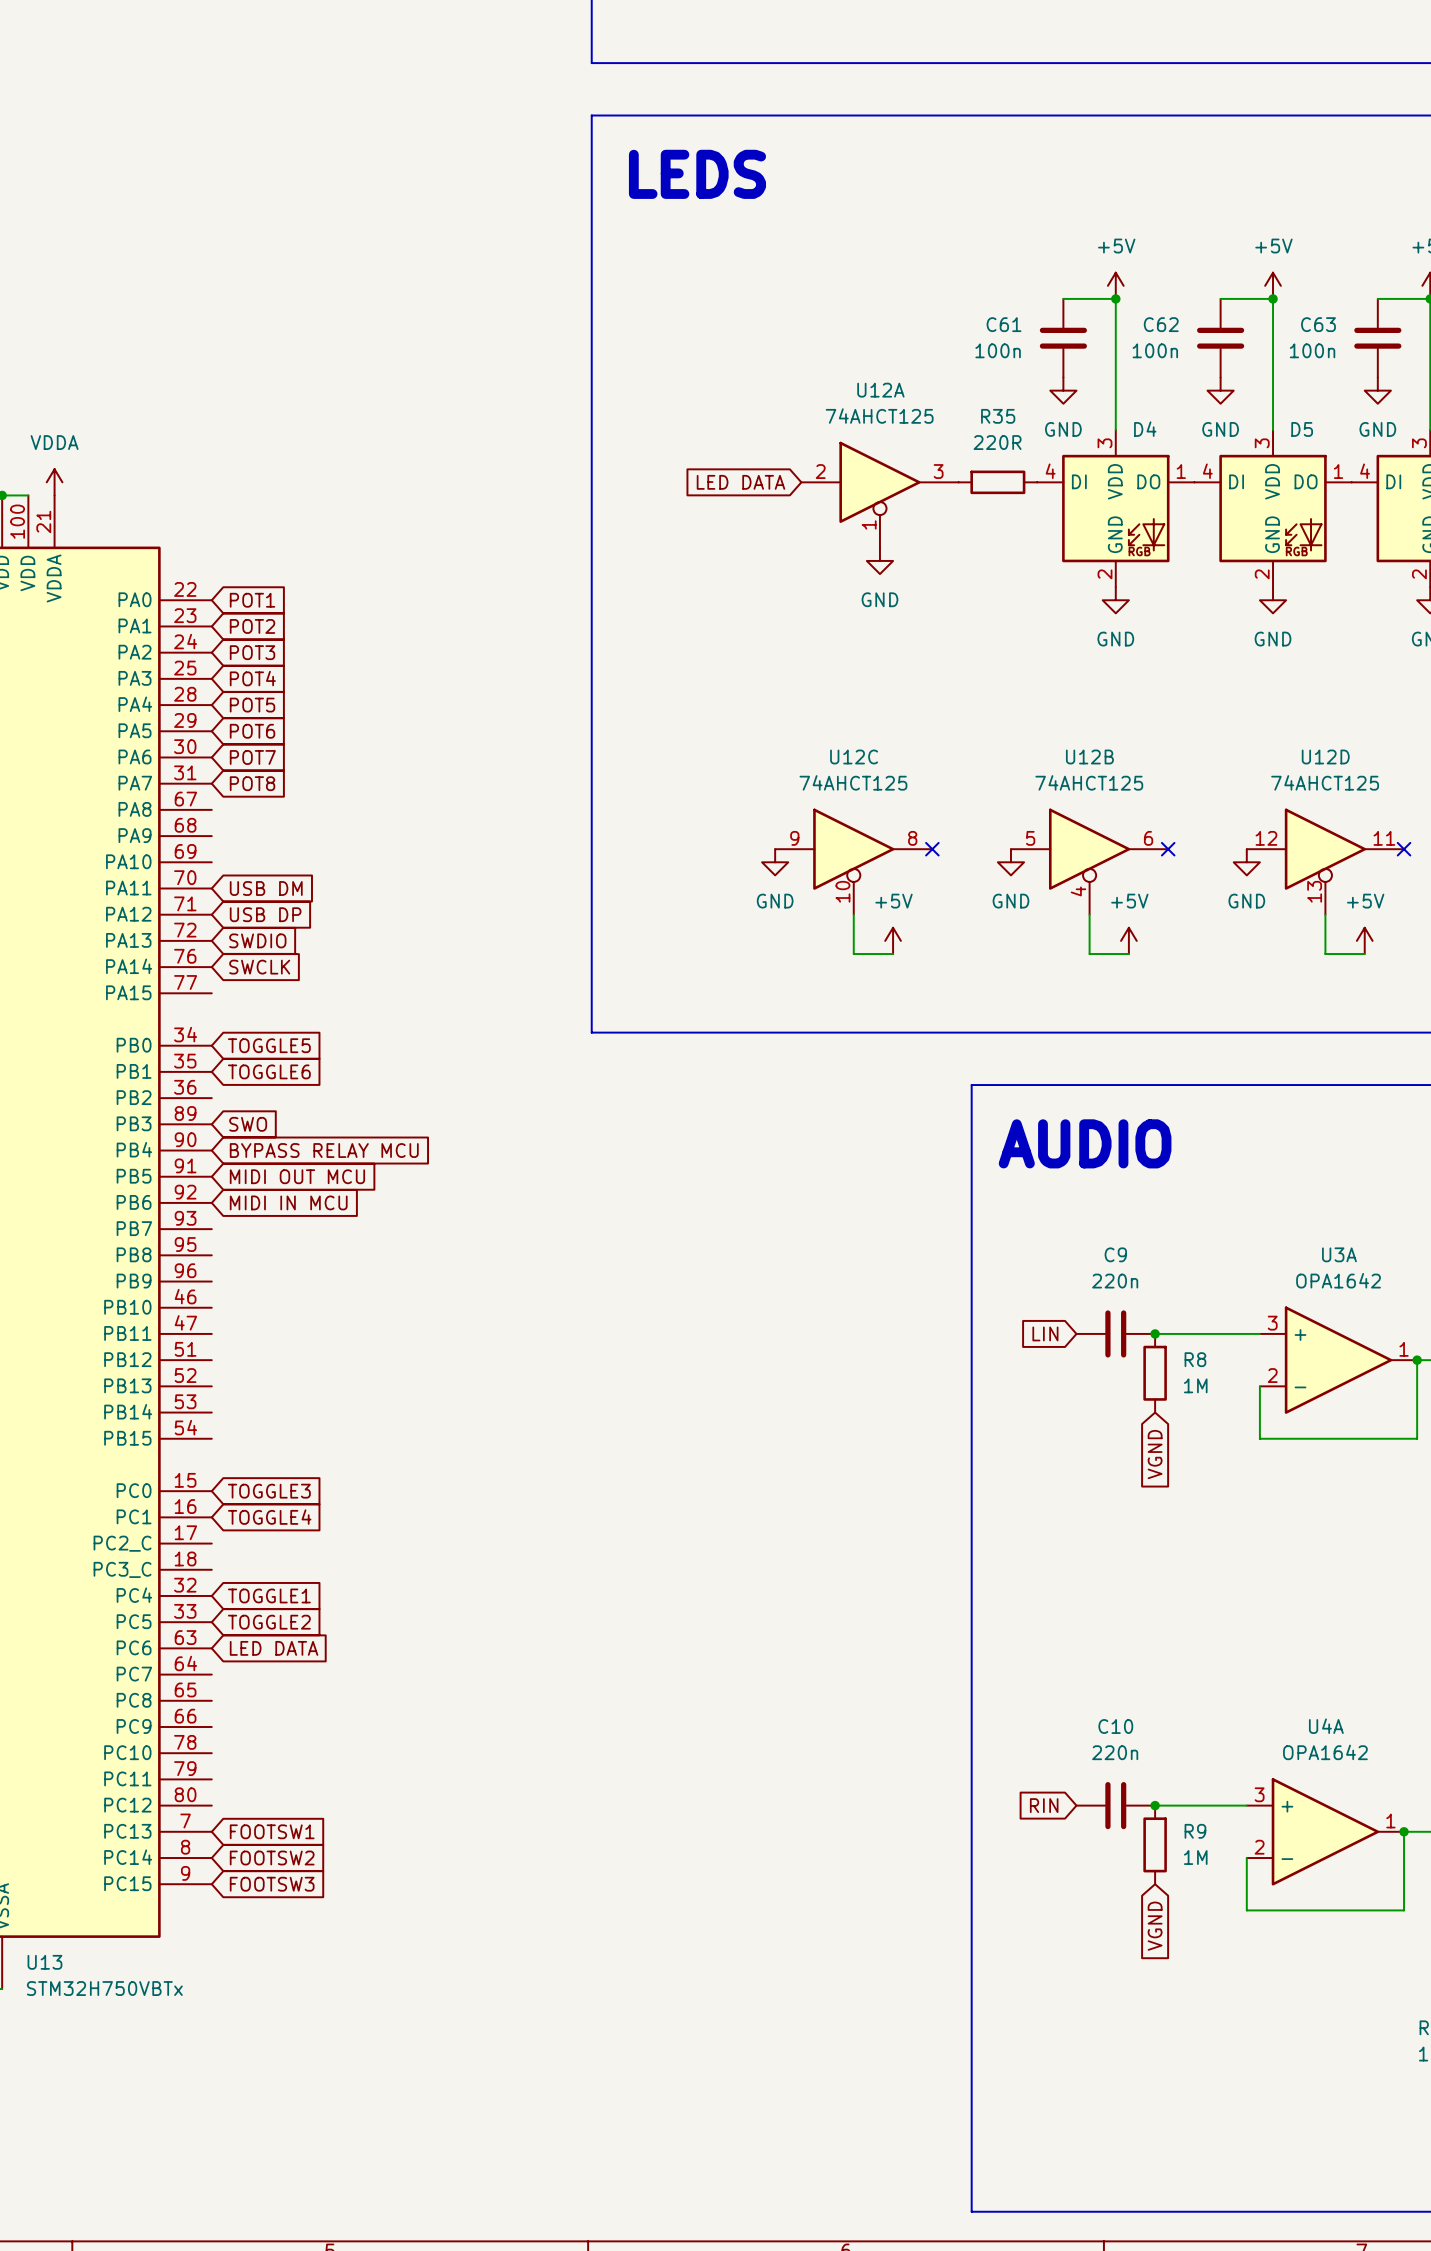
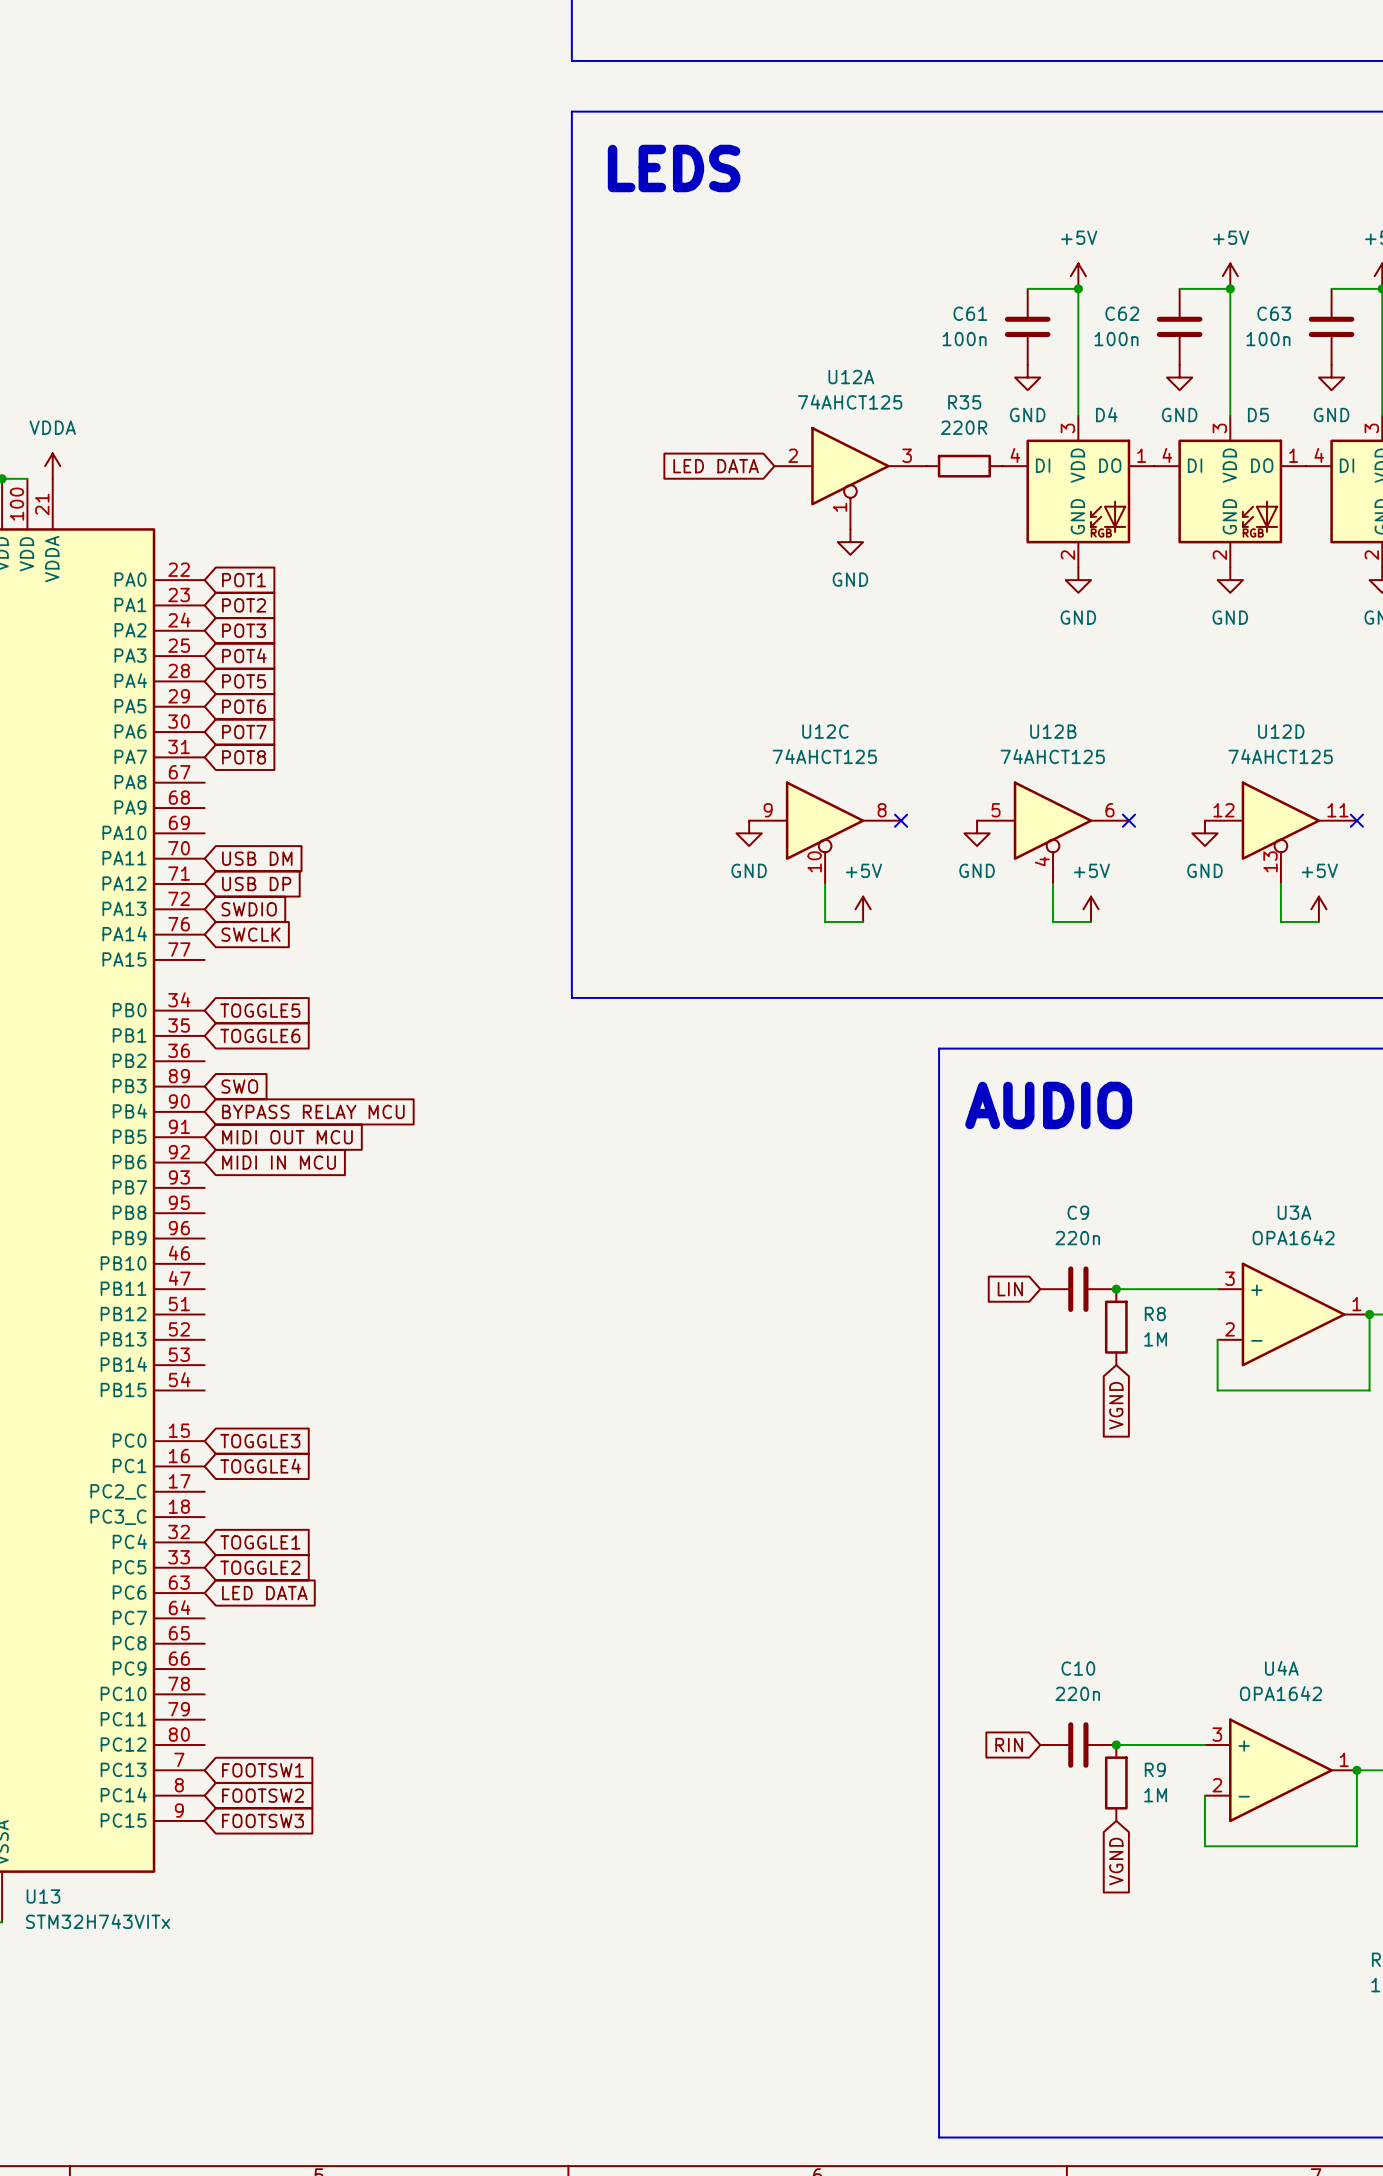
U13 value: STM32H750VBTx (104, 1988) -> STM32H743VITx (98, 1921)

